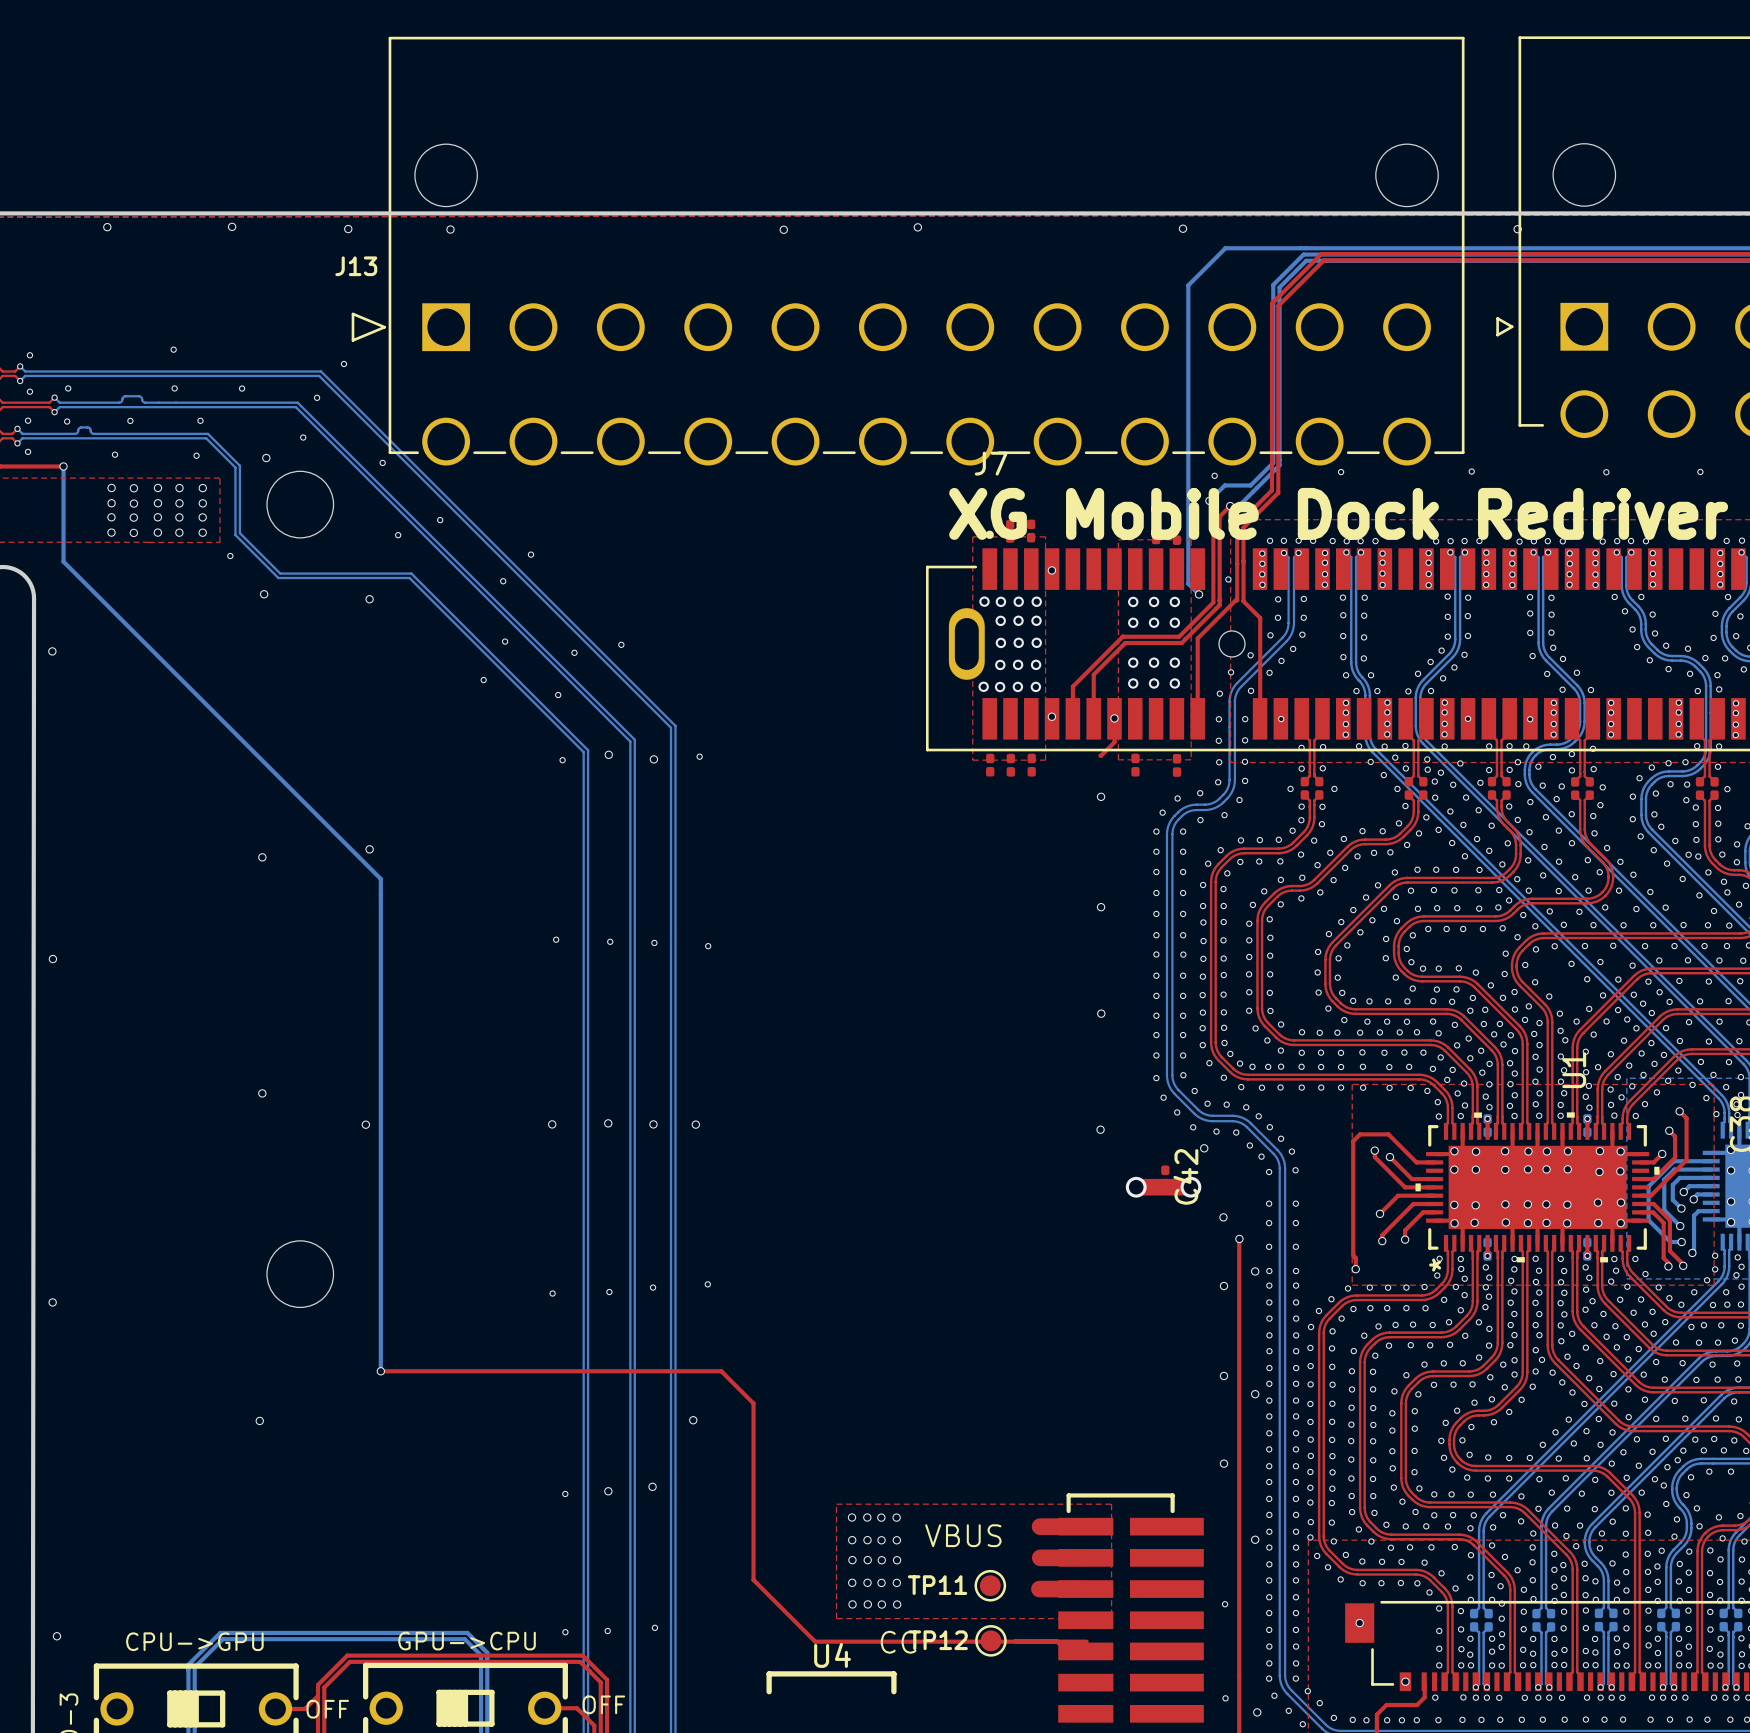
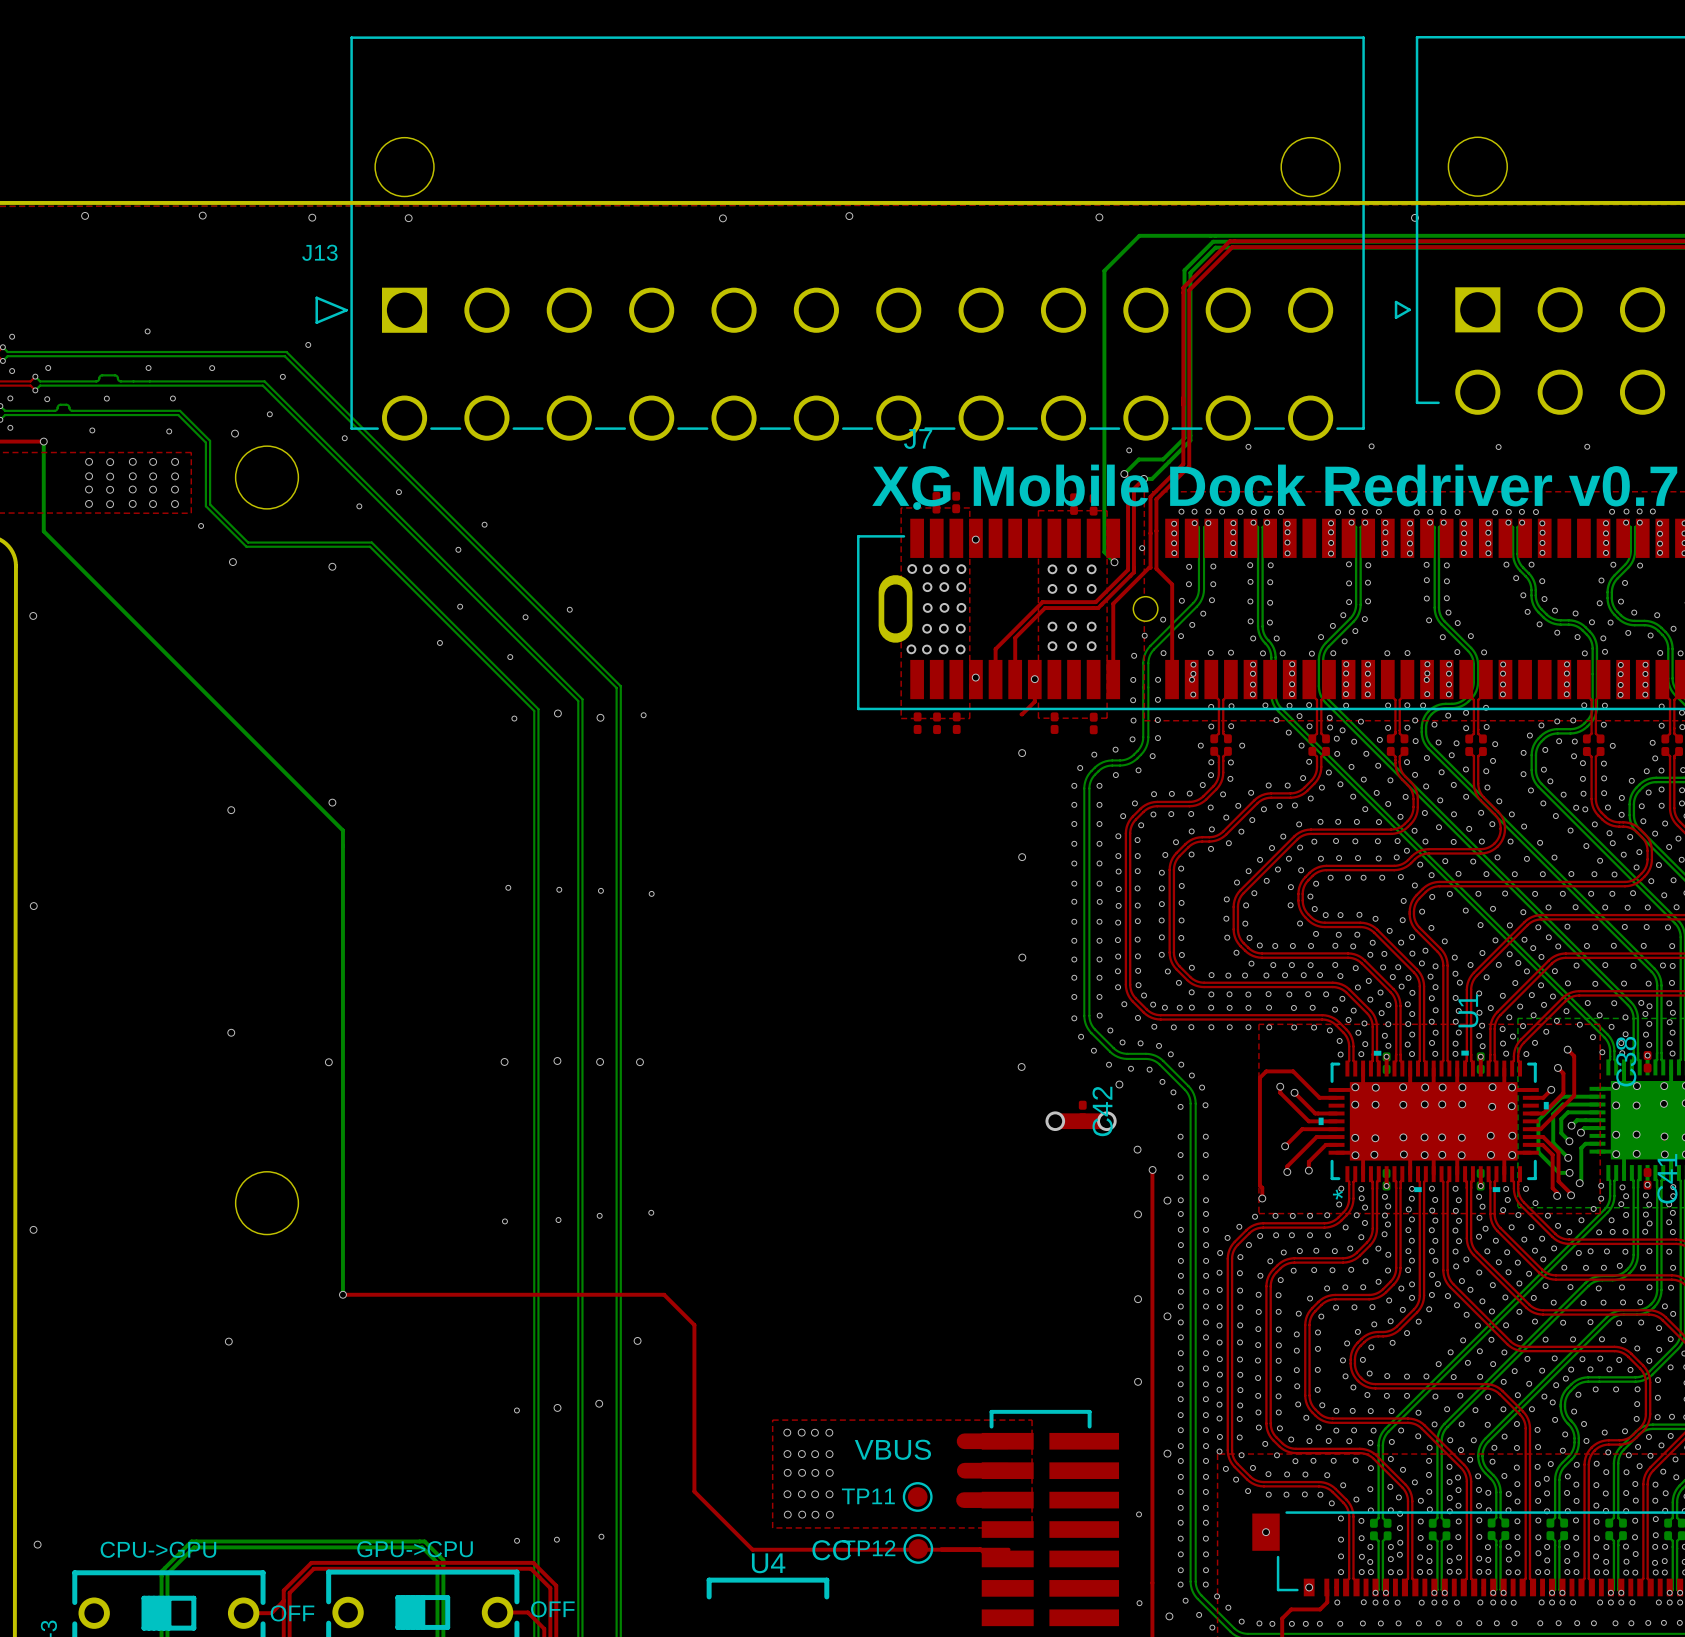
via: none -> (1210, 652)
via: none -> (1231, 652)
via: none -> (1387, 653)
via: none -> (1407, 653)
via: none -> (1367, 664)
via: none -> (1427, 664)
via: none -> (1193, 664)
via: none -> (1193, 673)
via: none -> (1367, 673)
via: none -> (1427, 673)
via: (1468, 718) -> none
via: none -> (1367, 684)
via: none -> (1193, 694)
via: none -> (1367, 694)
via: none -> (1427, 694)

